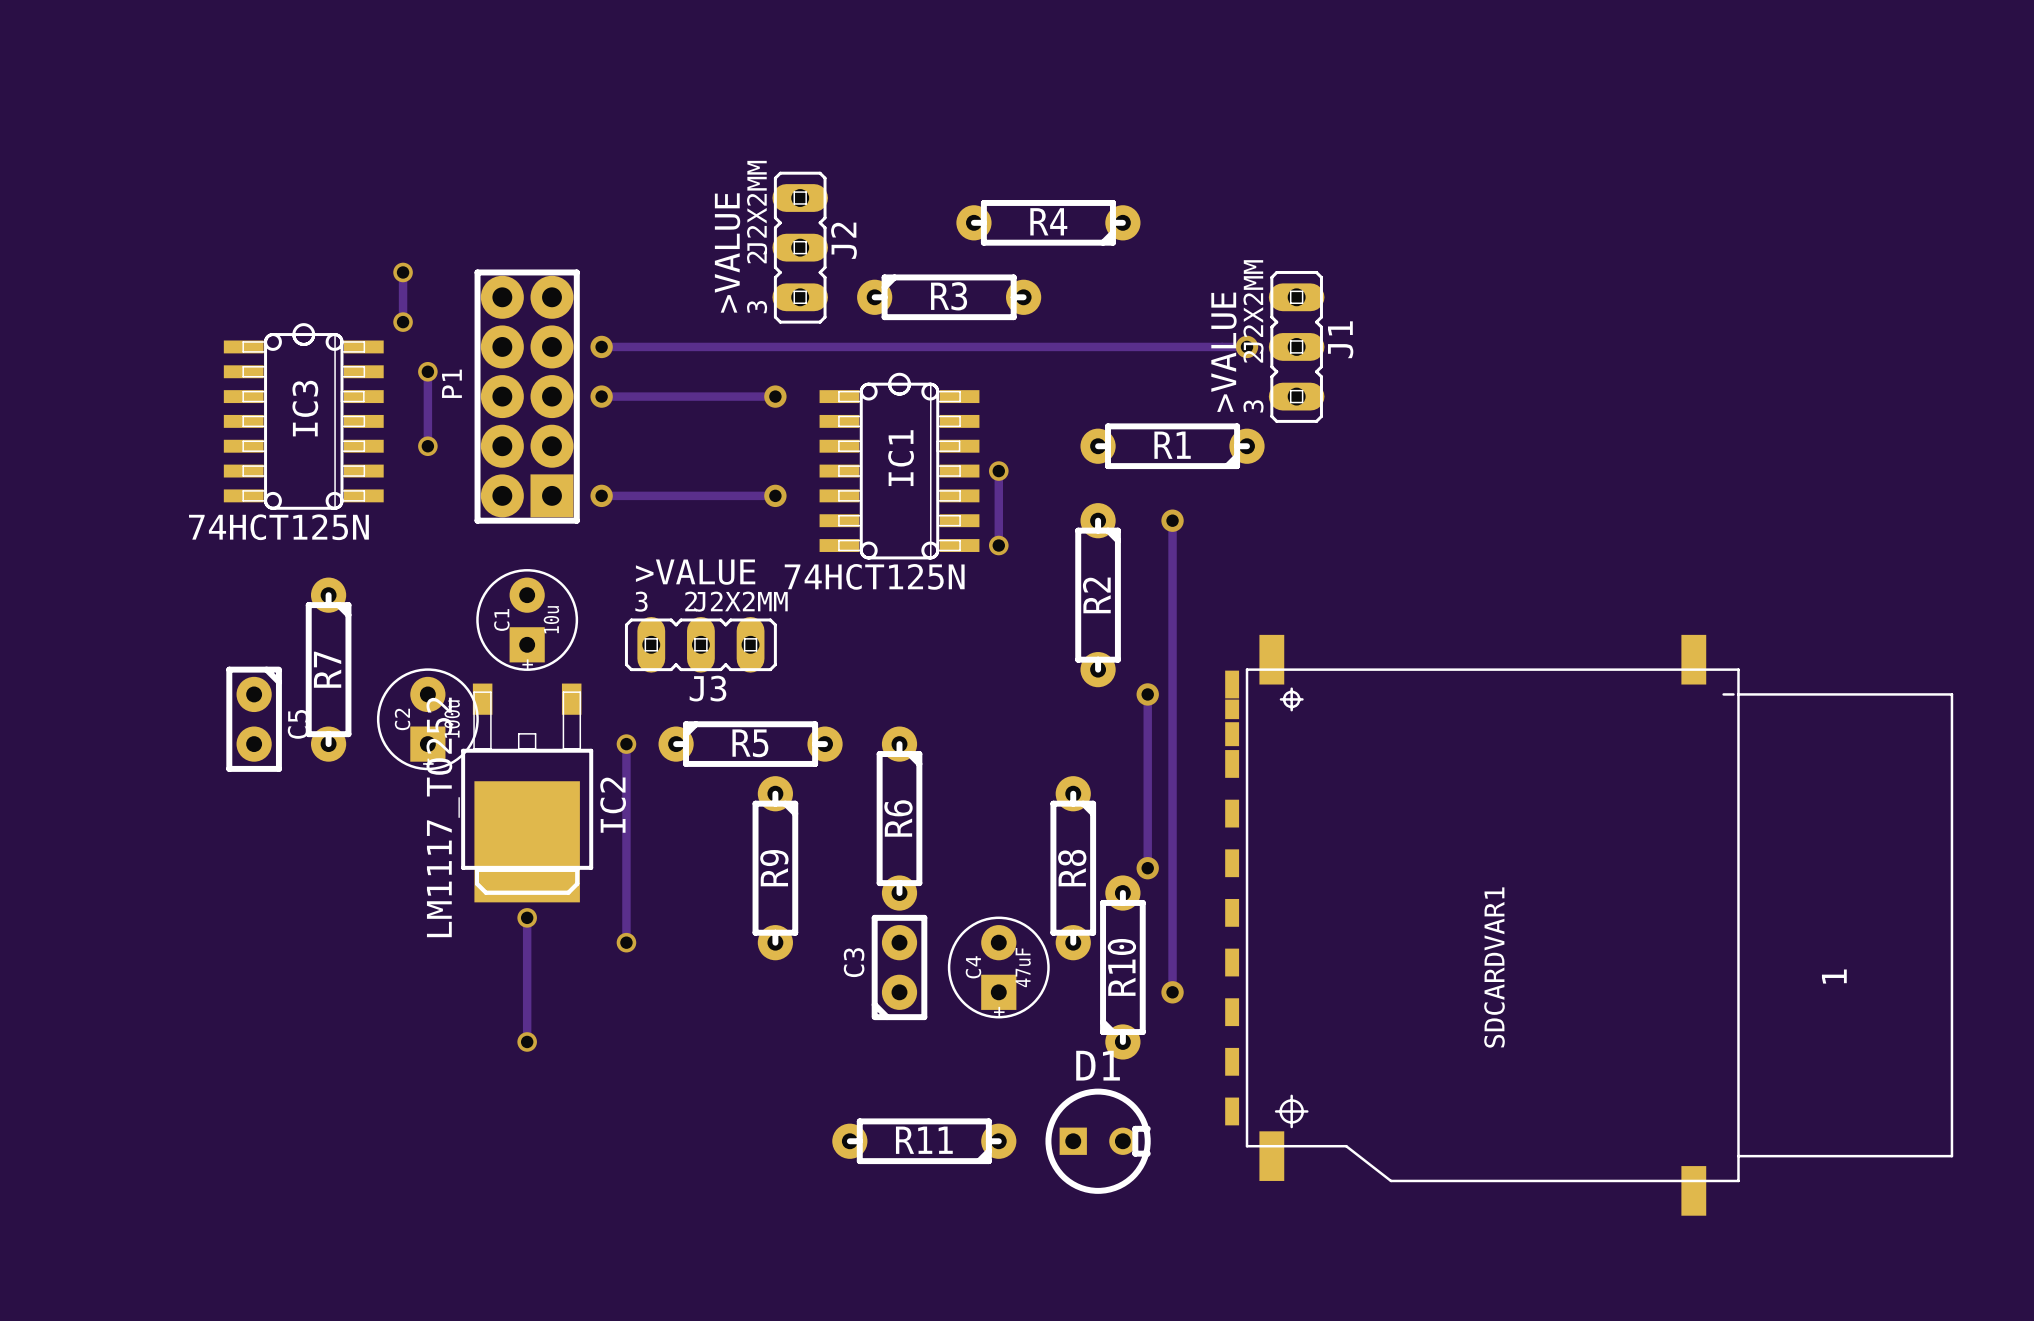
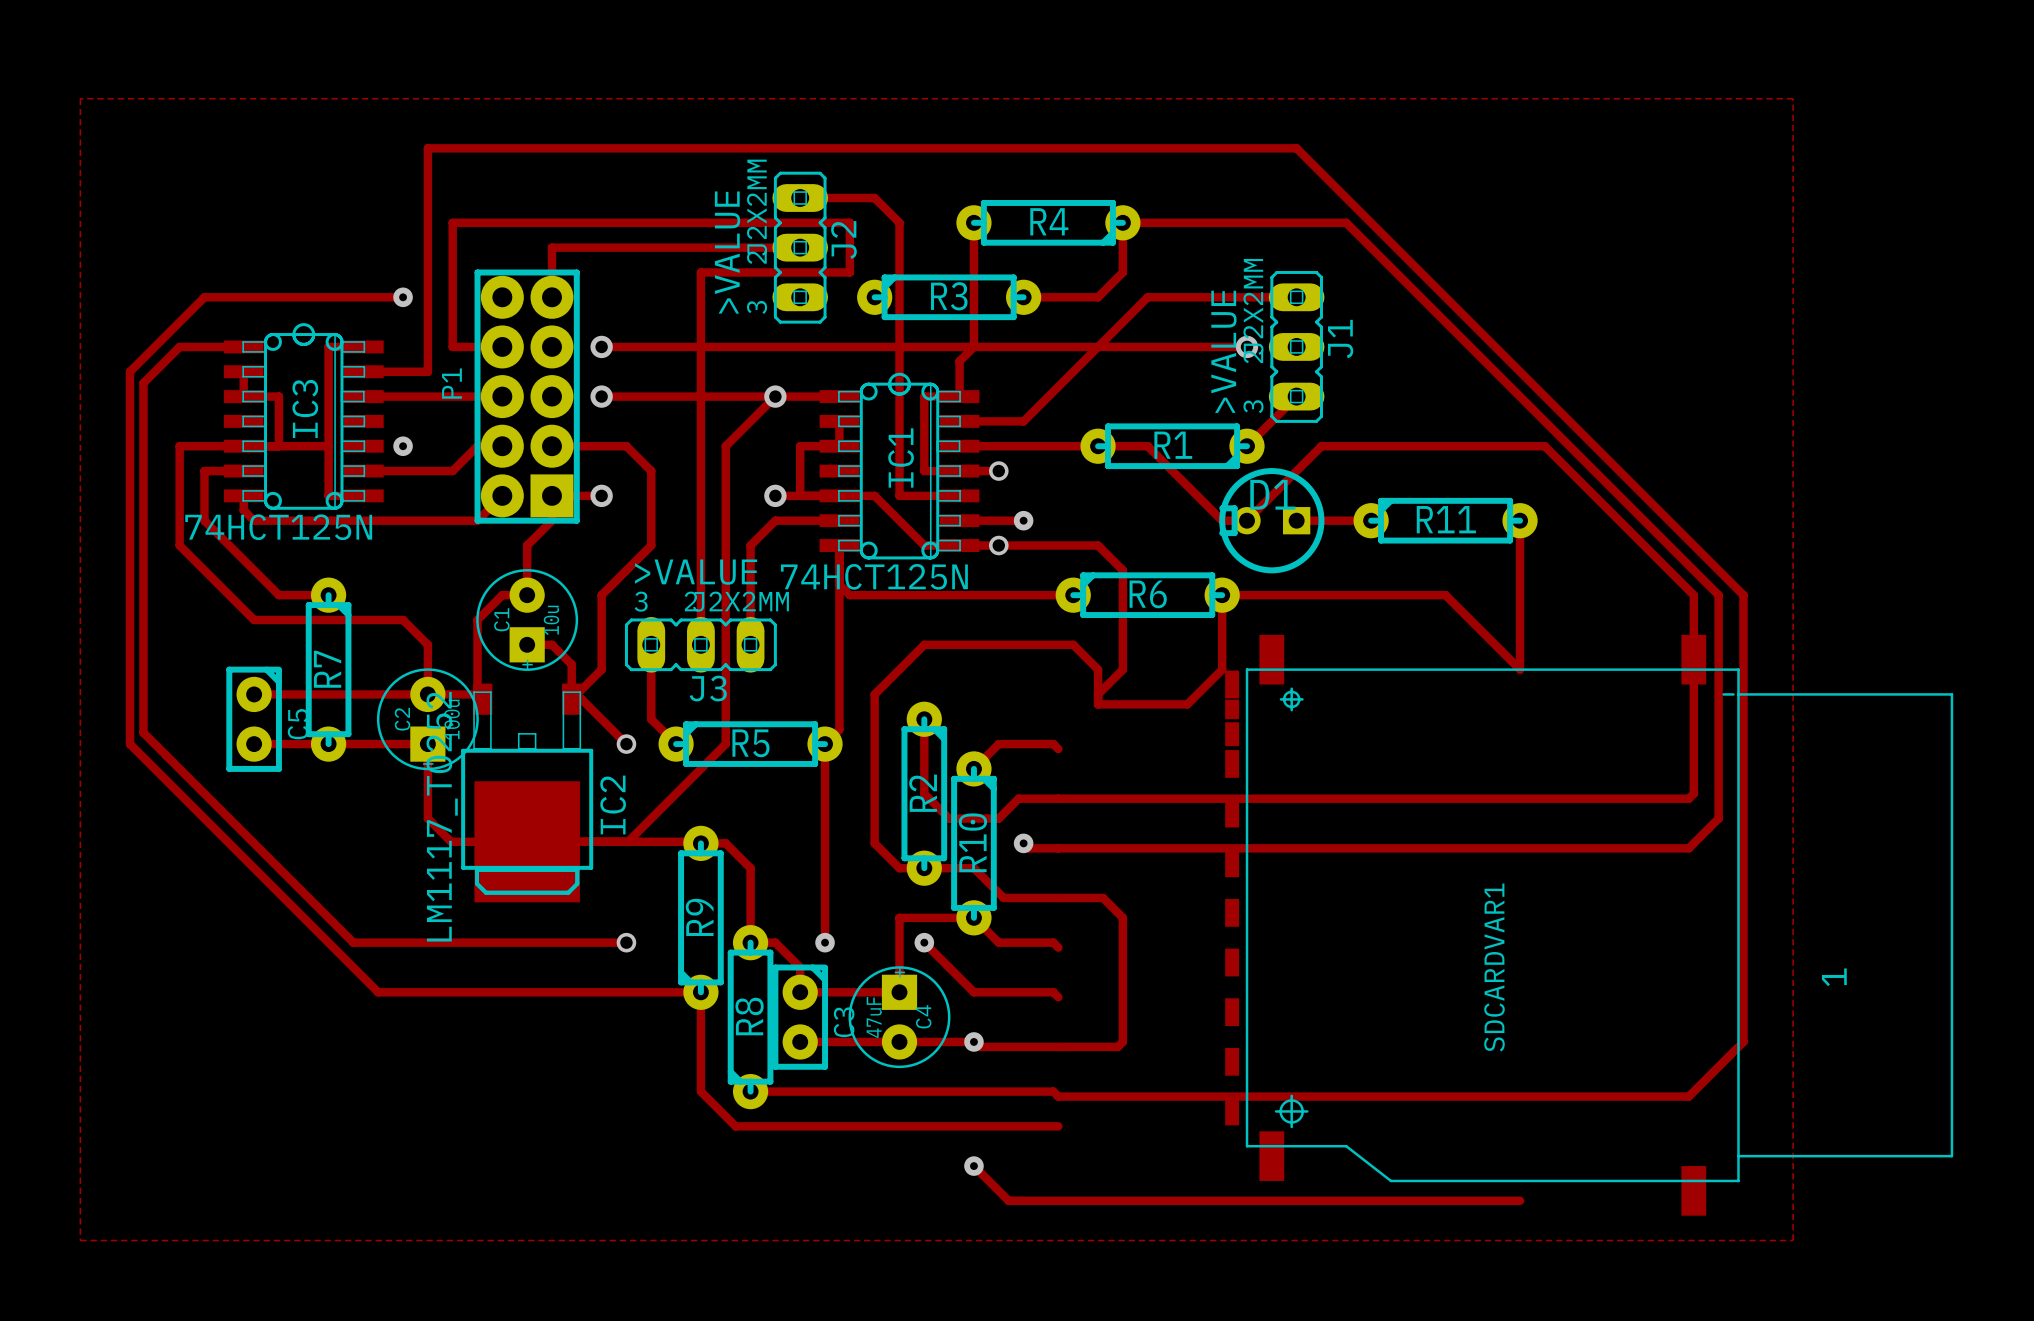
zone outline: none -> (80, 98) (1793, 98) (1793, 1240) (80, 1240) (80, 98)
track: none -> (800, 198) (874, 198) (899, 222) (899, 495) (959, 495)
track: none -> (800, 247) (551, 247) (551, 297)
track: (403, 272) (403, 322) -> none
via: (403, 272) -> none
track: none -> (403, 297) (204, 297) (130, 371) (130, 744) (378, 992) (700, 992) (700, 1091) (735, 1126) (1058, 1126)
via: none -> (403, 297)
track: none -> (1023, 297) (1098, 297) (1122, 272) (1122, 222) (1346, 222) (1718, 595) (1718, 818) (1688, 848) (1028, 848) (1023, 843)
track: none -> (1296, 297) (1147, 297) (1023, 421) (949, 421)
via: (403, 322) -> none
track: none -> (243, 346) (179, 346) (143, 383) (143, 732) (353, 942) (626, 942)
track: none -> (363, 346) (328, 346) (328, 495) (363, 495)
track: none -> (502, 346) (452, 346) (452, 222) (849, 222) (849, 272) (700, 272) (700, 644)
track: none -> (243, 371) (243, 396) (278, 396) (278, 446)
track: none -> (363, 371) (427, 371) (427, 148) (1296, 148) (1743, 595) (1743, 1041) (1688, 1096) (1058, 1096) (1053, 1091) (750, 1091)
track: (427, 371) (427, 446) -> none
via: (427, 371) -> none
track: none -> (363, 396) (502, 396)
track: none -> (839, 396) (775, 396) (725, 446) (725, 744) (628, 841)
track: none -> (1296, 396) (1247, 446)
track: none -> (839, 421) (839, 446) (800, 446) (800, 495)
track: none -> (328, 446) (179, 446) (179, 545) (254, 619) (403, 619) (427, 644) (427, 694)
via: none -> (403, 446)
via: (427, 446) -> none
track: none -> (502, 446) (477, 446) (452, 471) (363, 471)
track: none -> (551, 446) (626, 446) (651, 471) (651, 545) (601, 595) (601, 669) (572, 699)
track: none -> (959, 446) (1147, 446) (1222, 520) (1247, 520) (1321, 446) (1544, 446) (1693, 595) (1693, 793) (1688, 798) (1018, 798) (998, 818) (949, 818) (924, 793) (924, 719)
track: none -> (254, 471) (204, 471) (204, 520) (278, 595) (328, 595)
track: (998, 471) (998, 545) -> (998, 471) (924, 471) (924, 396) (959, 396) (959, 361) (973, 346) (973, 222)
track: none -> (243, 495) (243, 510) (254, 520) (477, 520) (502, 495)
track: (601, 495) (775, 495) -> (601, 495) (551, 495) (551, 520) (527, 545) (527, 595) (502, 595) (477, 619) (477, 694) (482, 699)
track: none -> (775, 495) (874, 495) (924, 545) (1098, 545) (1122, 570) (1122, 669) (1098, 694)
track: none -> (839, 520) (775, 520) (750, 545) (750, 644)
track: none -> (959, 520) (1023, 520)
via: none -> (1023, 520)
track: (1172, 520) (1172, 992) -> none
via: (1172, 520) -> none
track: none -> (1296, 520) (1371, 520)
track: none -> (1520, 520) (1520, 669) (1445, 595) (1222, 595) (1222, 669) (1187, 704) (1098, 704) (1098, 669) (1073, 644) (924, 644) (874, 694) (874, 843) (899, 868) (973, 868) (1003, 897) (1103, 897) (1122, 917) (1122, 1041) (1117, 1046) (978, 1046) (973, 1041) (800, 1041)
track: none -> (839, 545) (839, 729) (825, 744) (825, 942)
track: none -> (839, 584) (849, 595) (1073, 595)
R2 position: (1098, 595) -> (924, 793)
track: none -> (651, 644) (651, 719) (676, 744)
track: none -> (254, 694) (477, 694)
track: (1147, 694) (1147, 868) -> none
via: (1147, 694) -> none
track: none -> (254, 744) (427, 744) (427, 818) (451, 841) (725, 843) (750, 868) (750, 942) (775, 942) (800, 967) (800, 992) (899, 992) (899, 917) (973, 917) (998, 942) (1053, 942) (1058, 947)
track: (626, 744) (626, 942) -> (626, 744) (581, 699) (571, 699) (571, 664) (551, 644) (527, 644)
track: none -> (1058, 749) (1053, 744) (998, 744) (973, 768)
R6 rotation: 0° (899, 818) -> 90° counterclockwise (1147, 595)
R6 position: (899, 818) -> (1147, 595)
via: none -> (1023, 843)
R9 rotation: 0° (775, 868) -> 180° (700, 917)
R8 rotation: 0° (1073, 868) -> 180° (750, 1017)
R8 position: (1073, 868) -> (750, 1017)
via: (1147, 868) -> none
track: (527, 917) (527, 1041) -> none
via: (527, 917) -> none
via: none -> (825, 942)
track: none -> (924, 942) (973, 992) (1053, 992) (1058, 997)
via: none -> (924, 942)
C3 rotation: 0° (899, 967) -> 180° (800, 1017)
C3 position: (899, 967) -> (800, 1017)
C4 rotation: 0° (998, 967) -> 180° (899, 1017)
C4 position: (998, 967) -> (899, 1017)
R10 rotation: 0° (1122, 967) -> 180° (973, 843)
R10 position: (1122, 967) -> (973, 843)
via: (1172, 992) -> none
via: (527, 1041) -> none
via: none -> (973, 1041)
D1 name position: D1 (1098, 1065) -> D1 (1272, 494)
R11 rotation: 0° (924, 1141) -> 180° (1445, 520)
R11 position: (924, 1141) -> (1445, 520)
D1 rotation: 0° (1098, 1141) -> 180° (1271, 520)
D1 position: (1098, 1141) -> (1271, 520)
track: none -> (973, 1166) (1008, 1200) (1520, 1200)
via: none -> (973, 1166)

